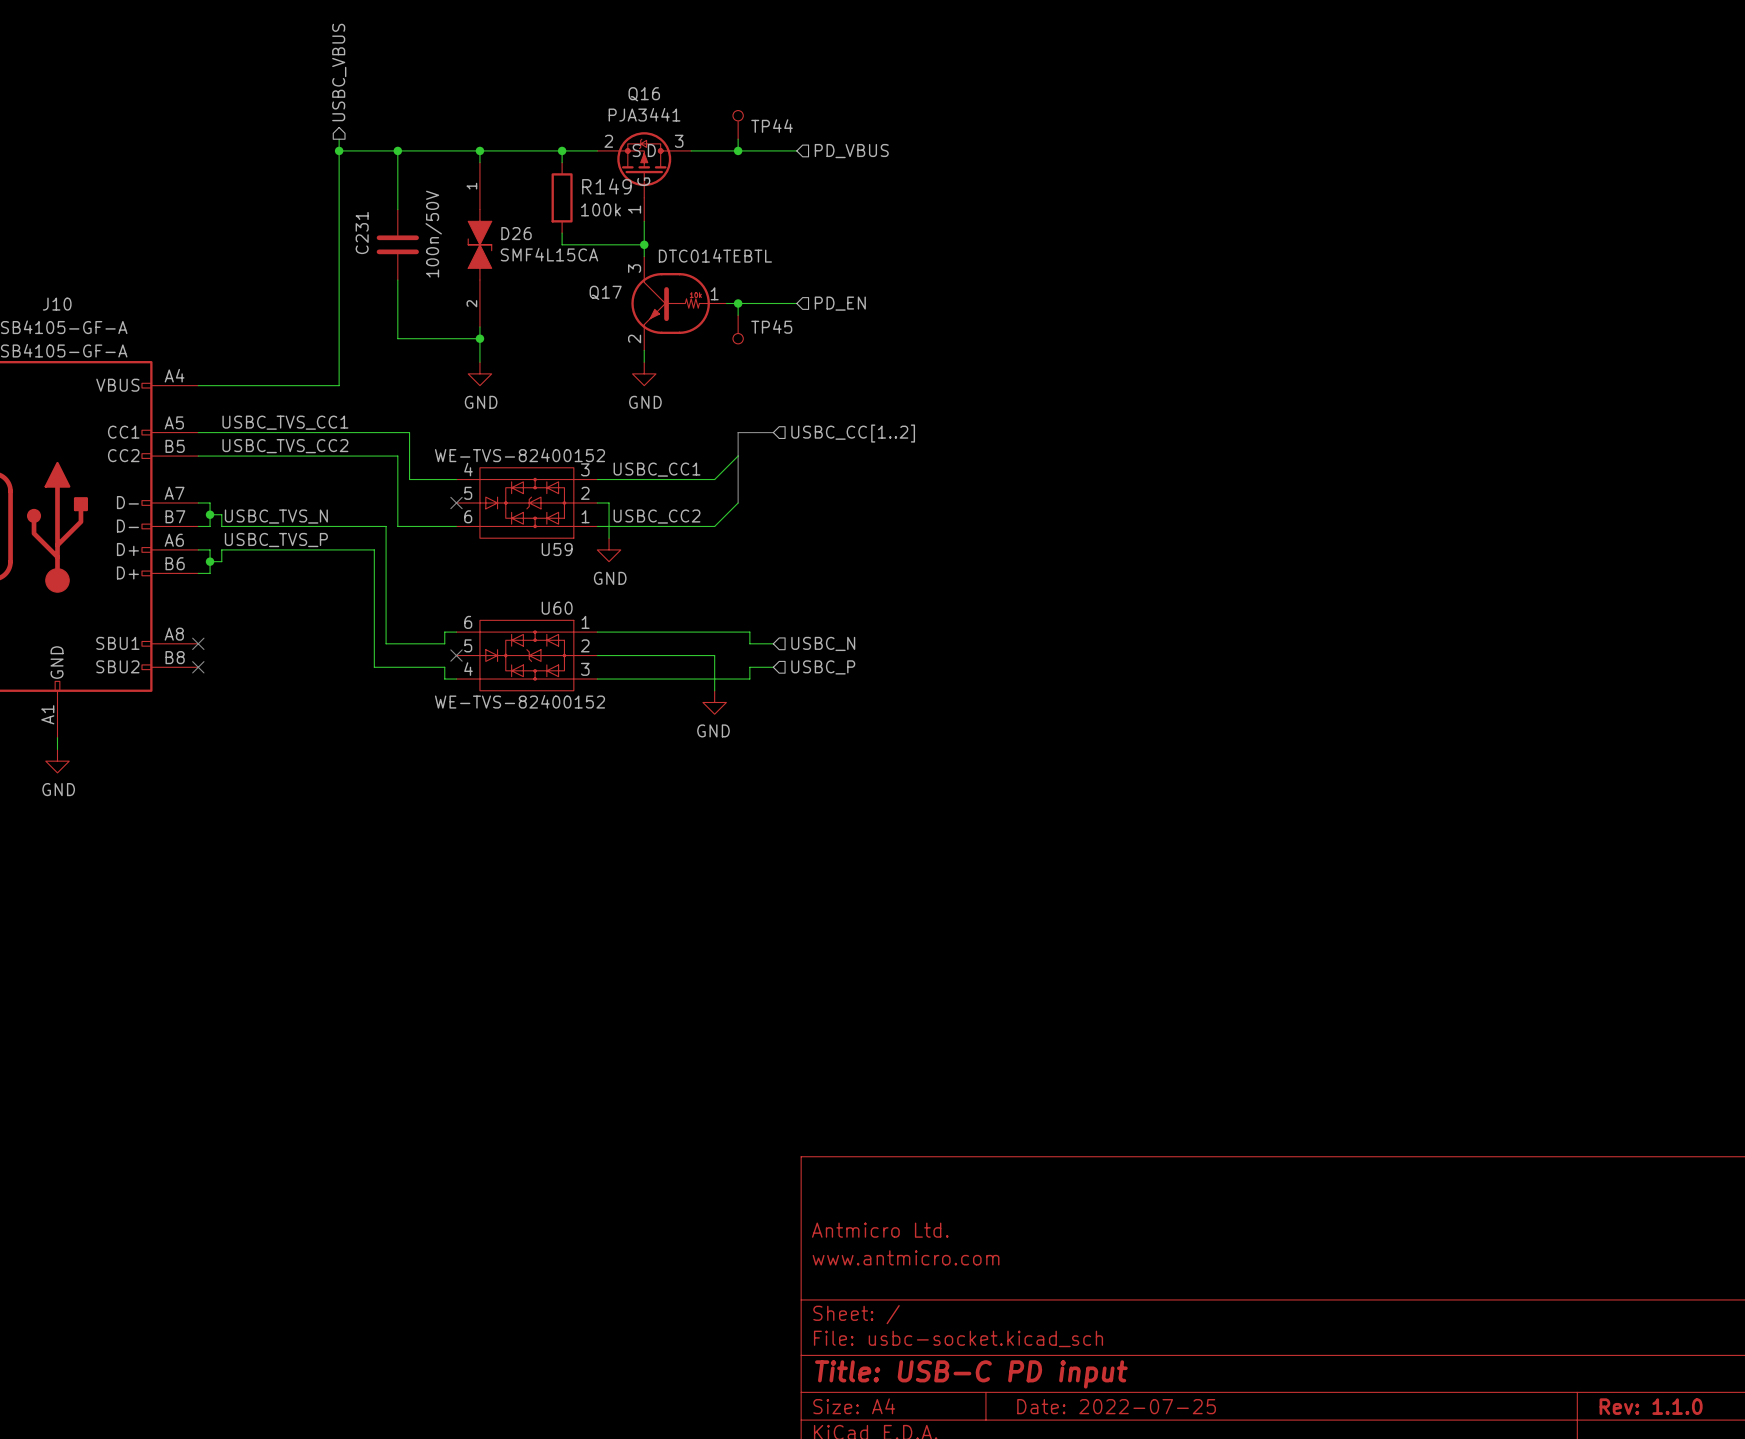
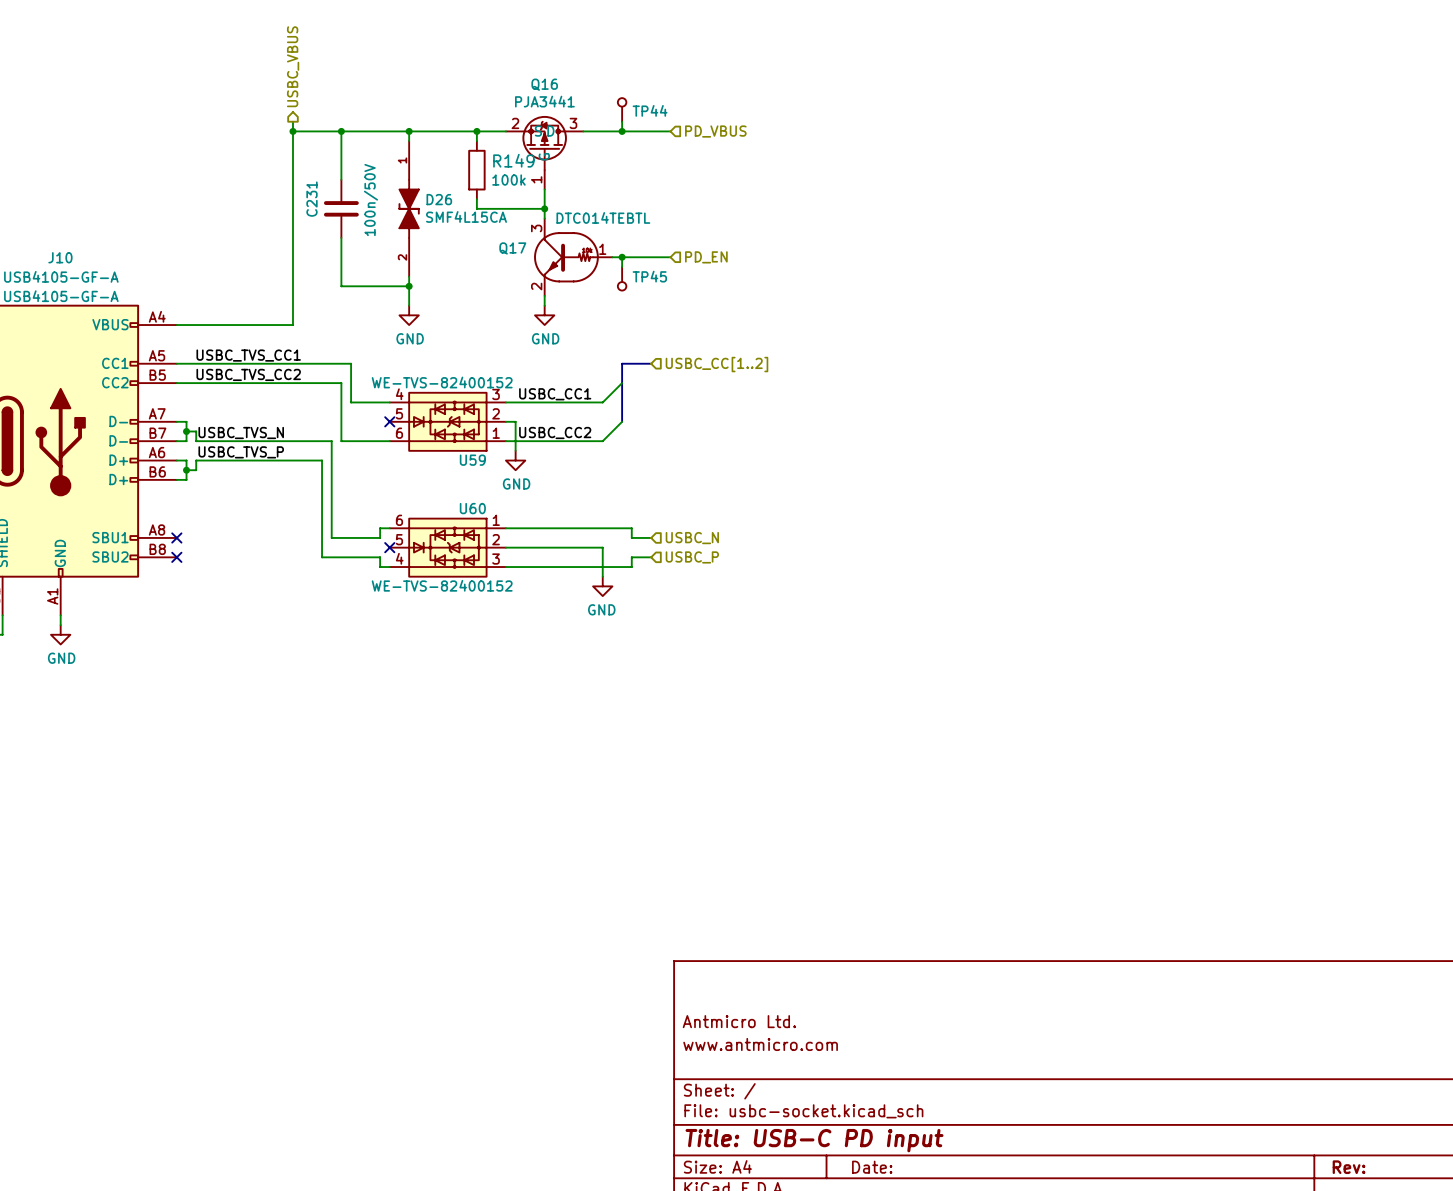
title block: Date: 2022-07-25 (1116, 1406) -> Date: (872, 1167)
title block: Rev: 1.1.0 (1651, 1406) -> Rev: (1349, 1167)

